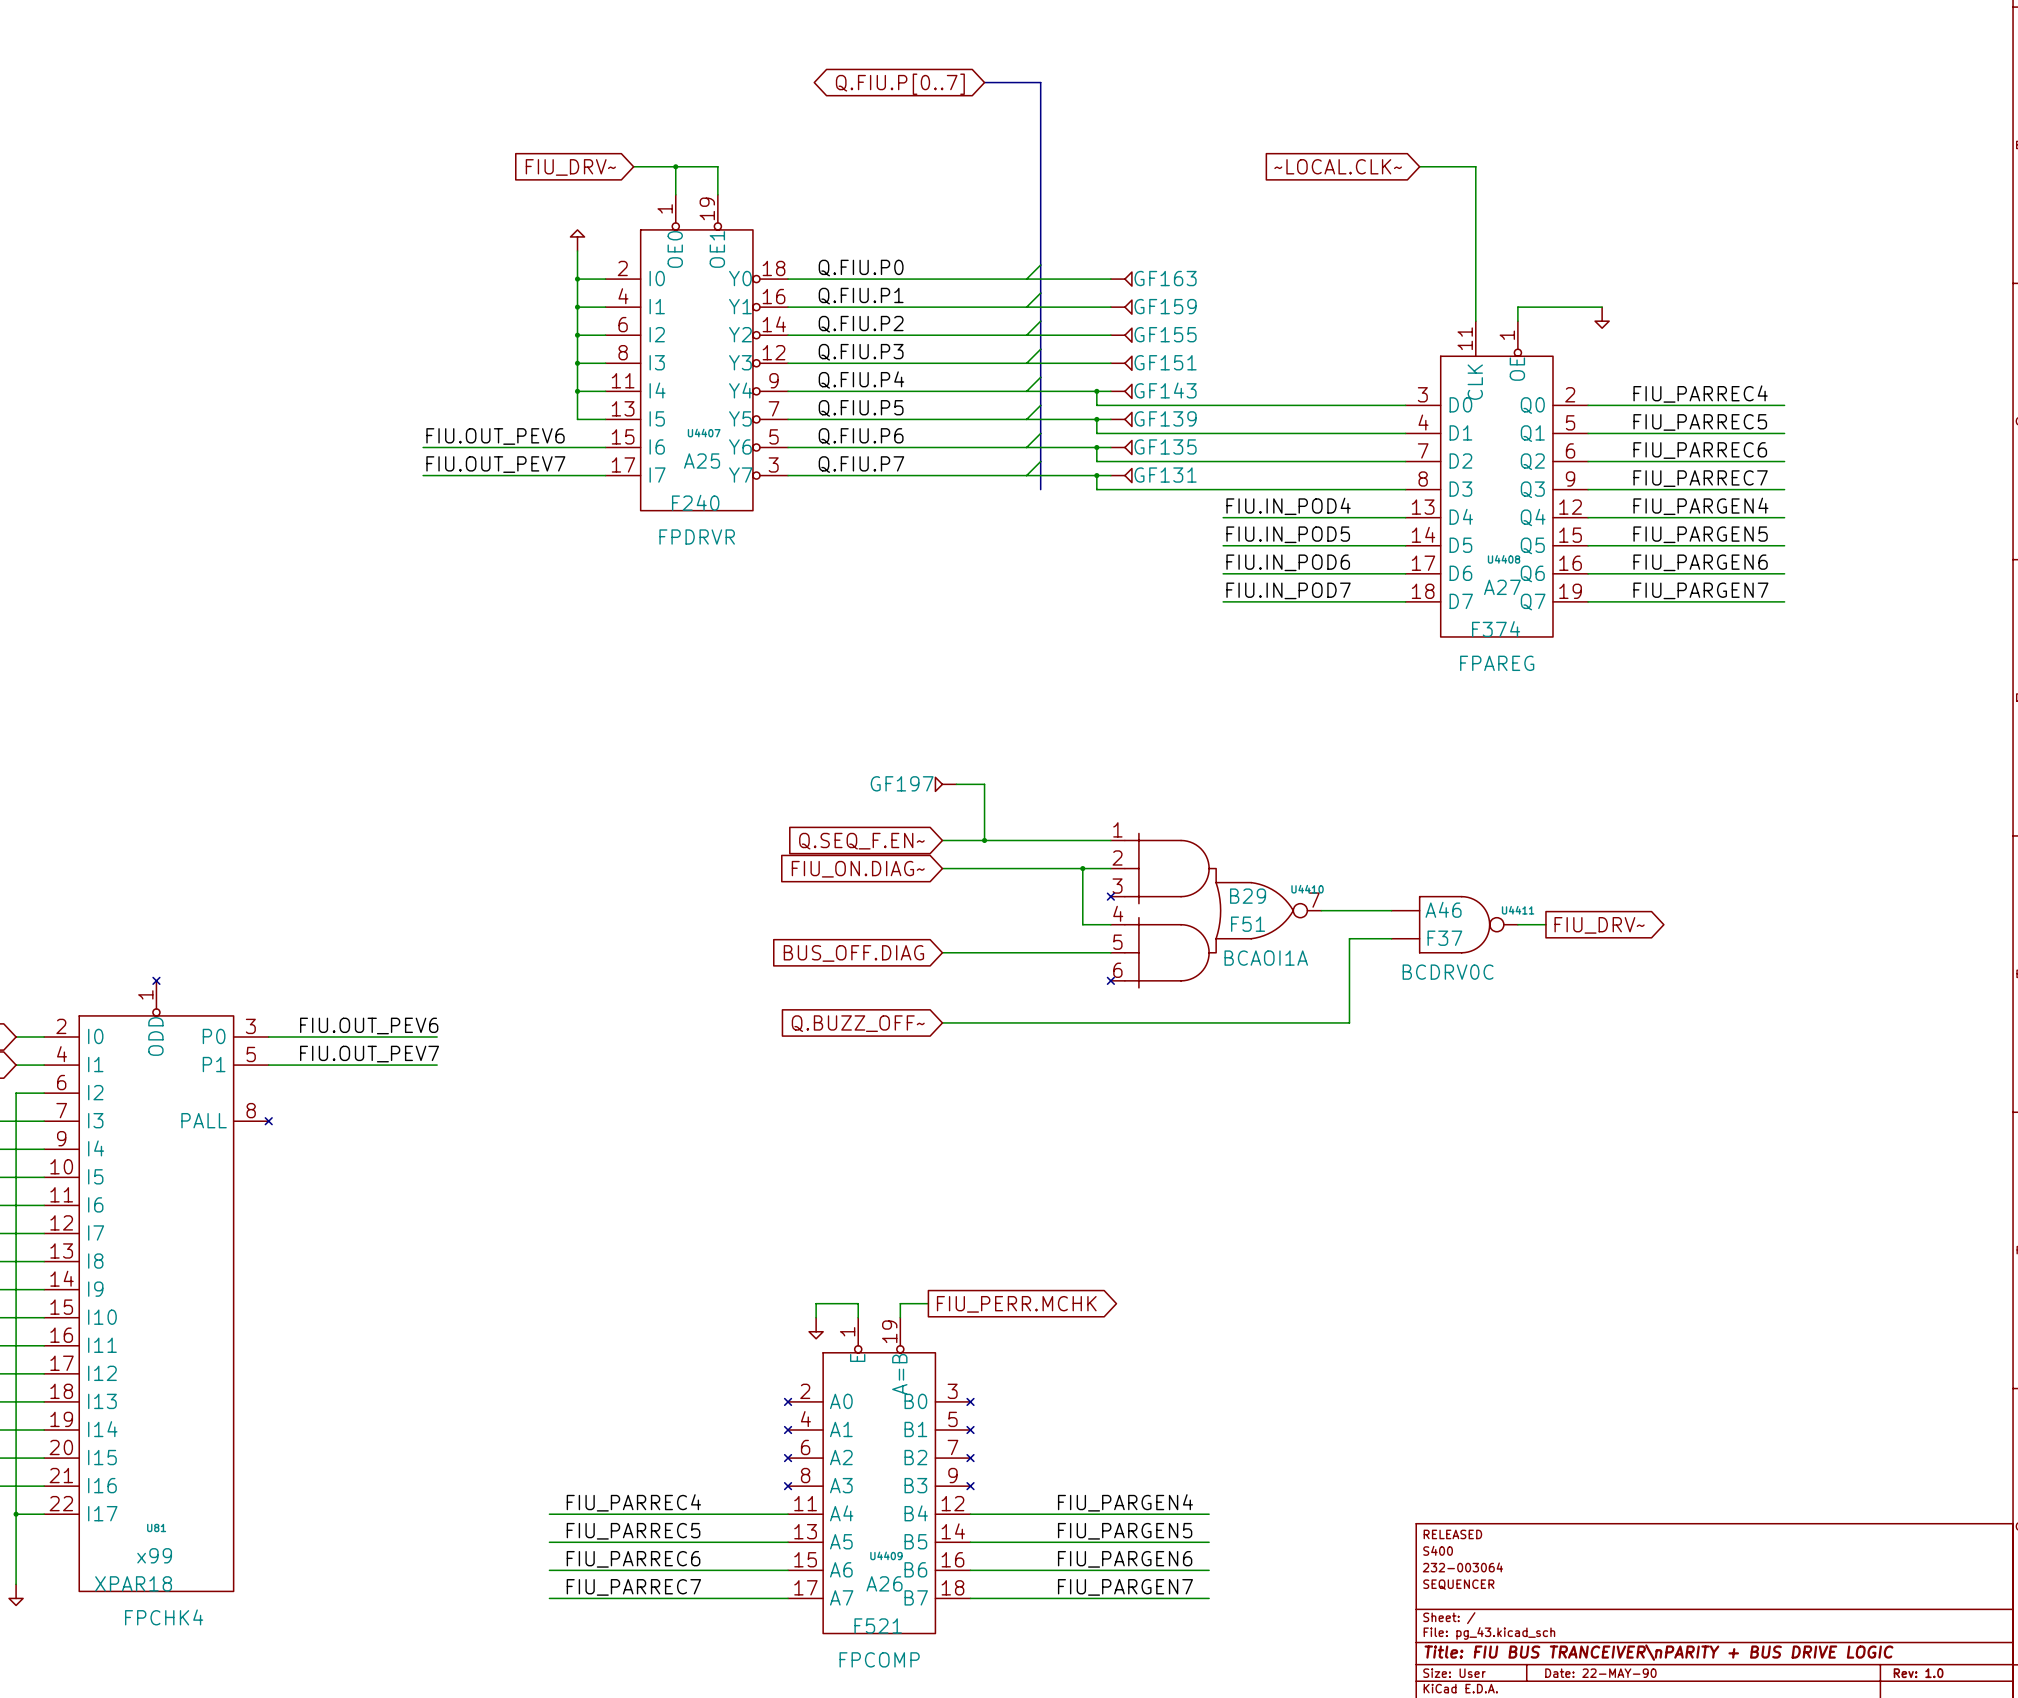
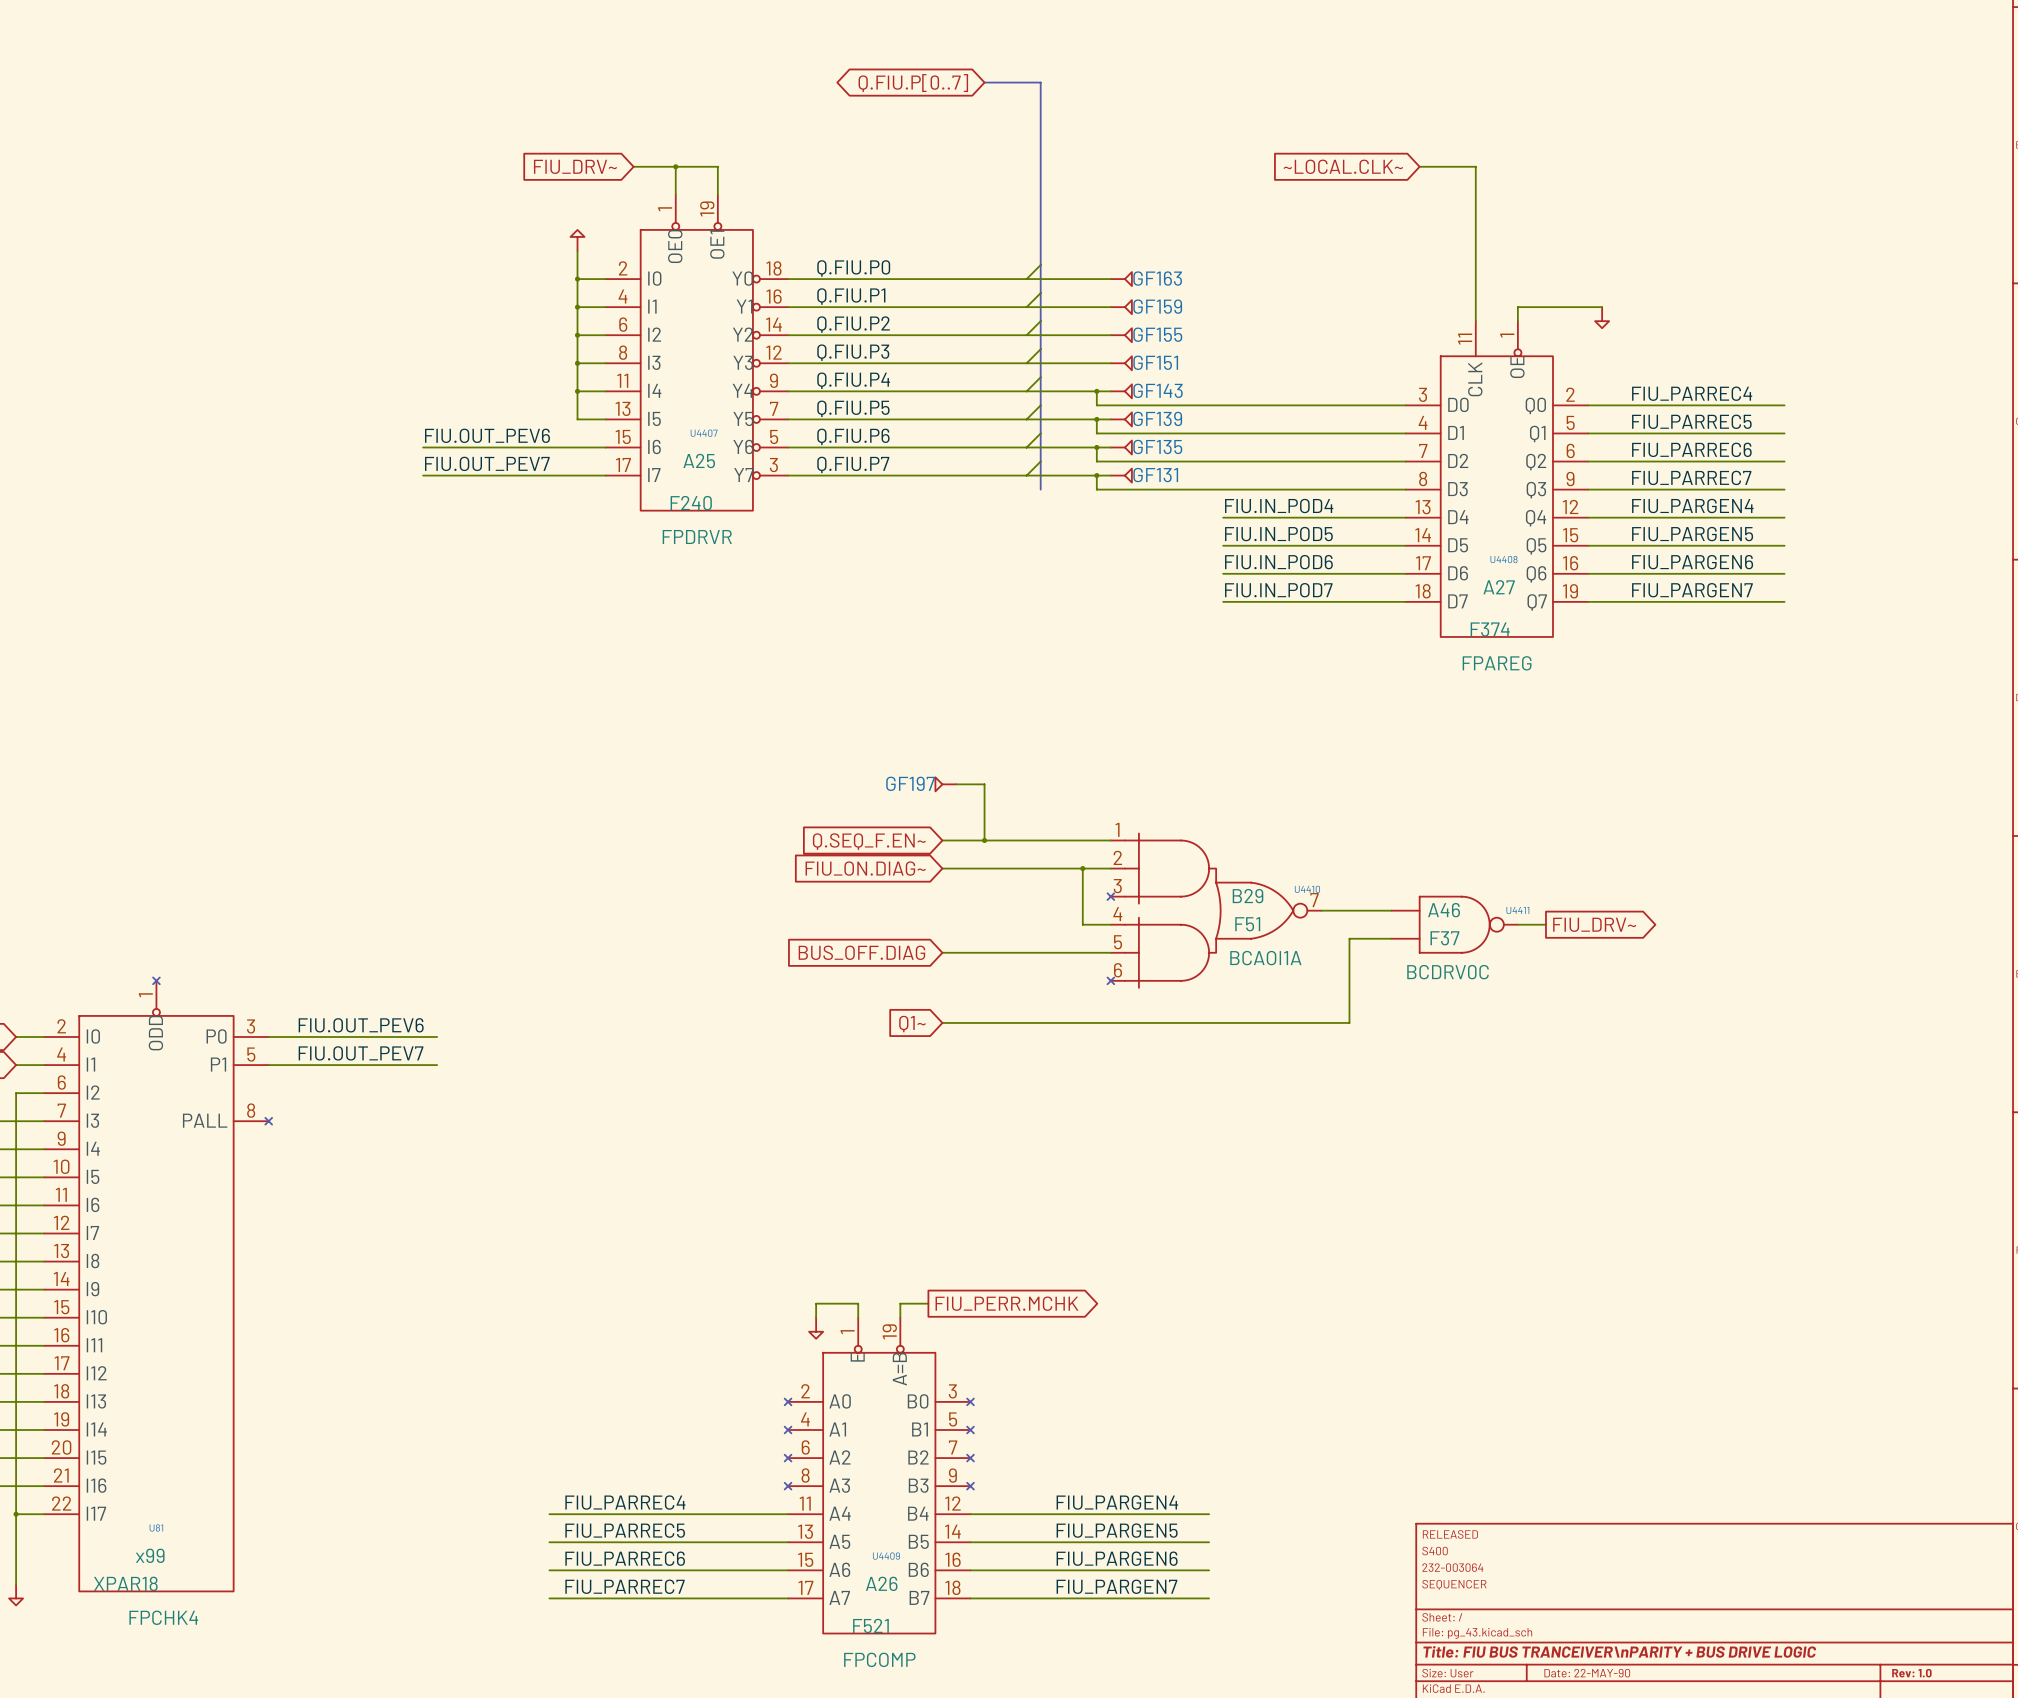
global label: Q.BUZZ_OFF~ (858, 1023) -> Q1~ (912, 1024)

